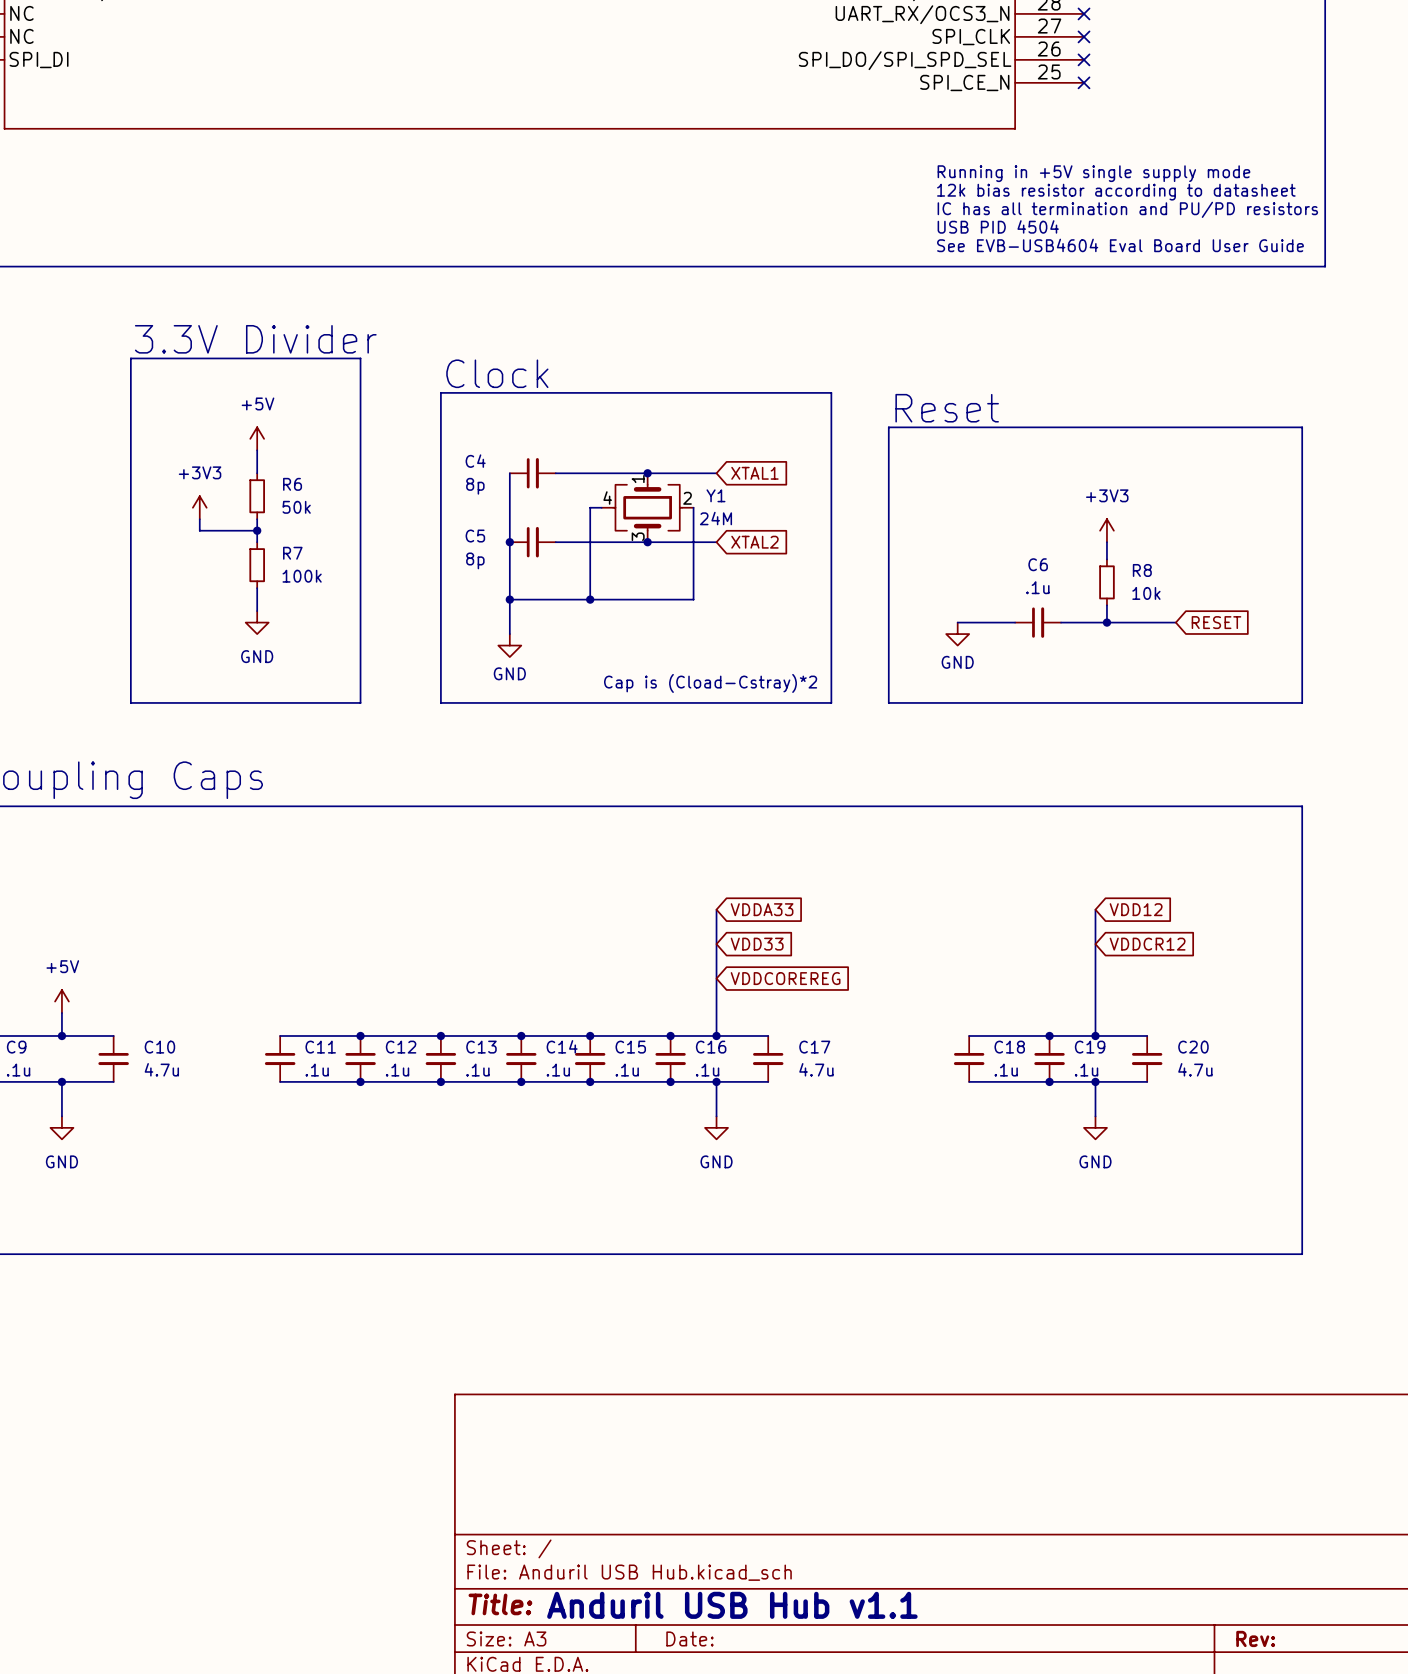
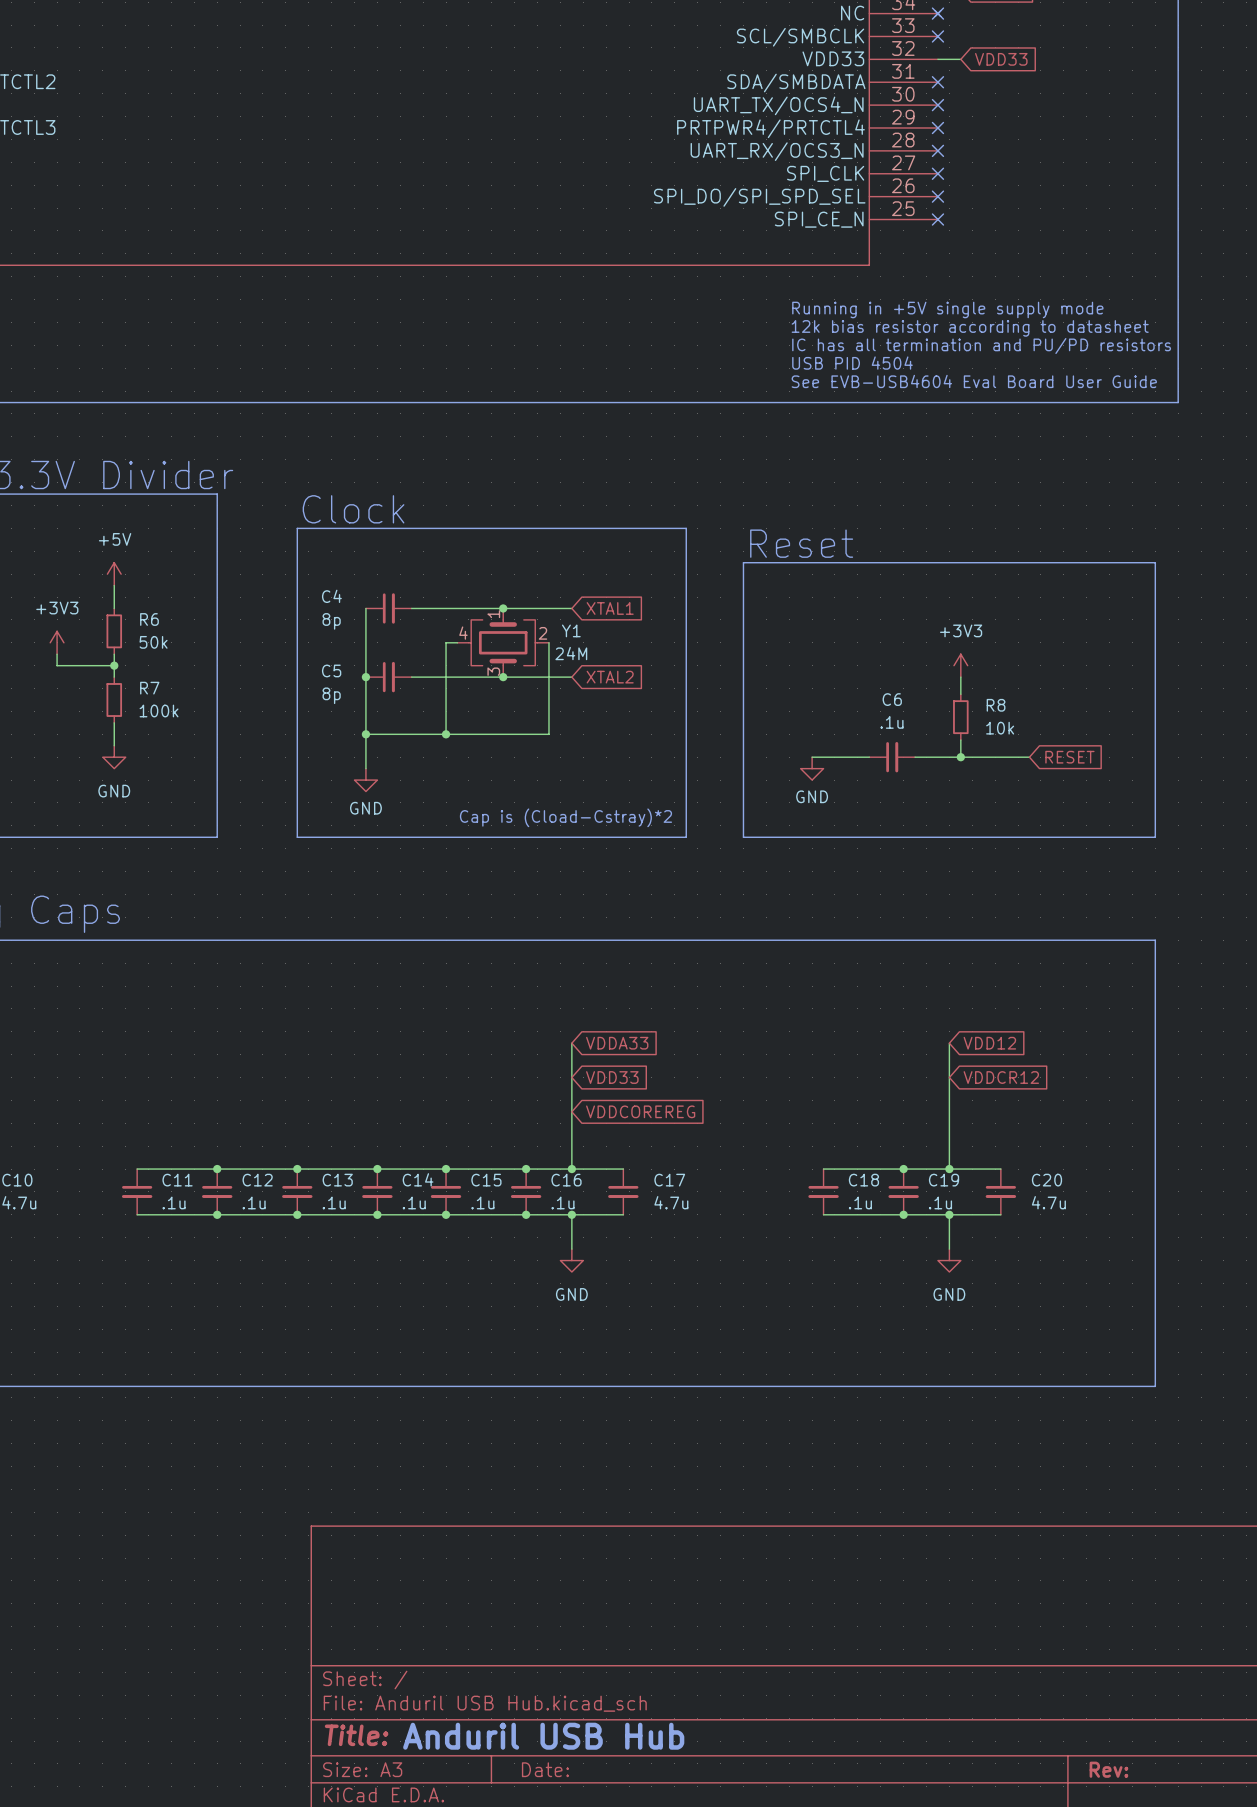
text: Anduril USB Hub v1.1 (732, 1605) -> Anduril USB Hub (543, 1736)

